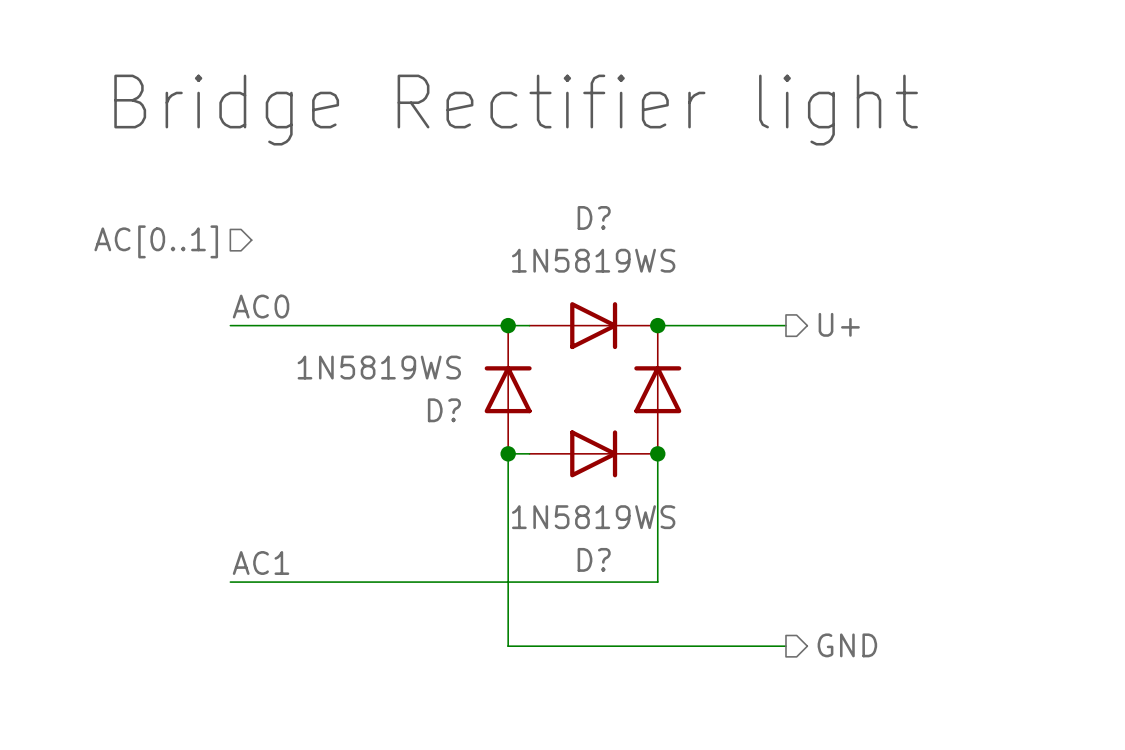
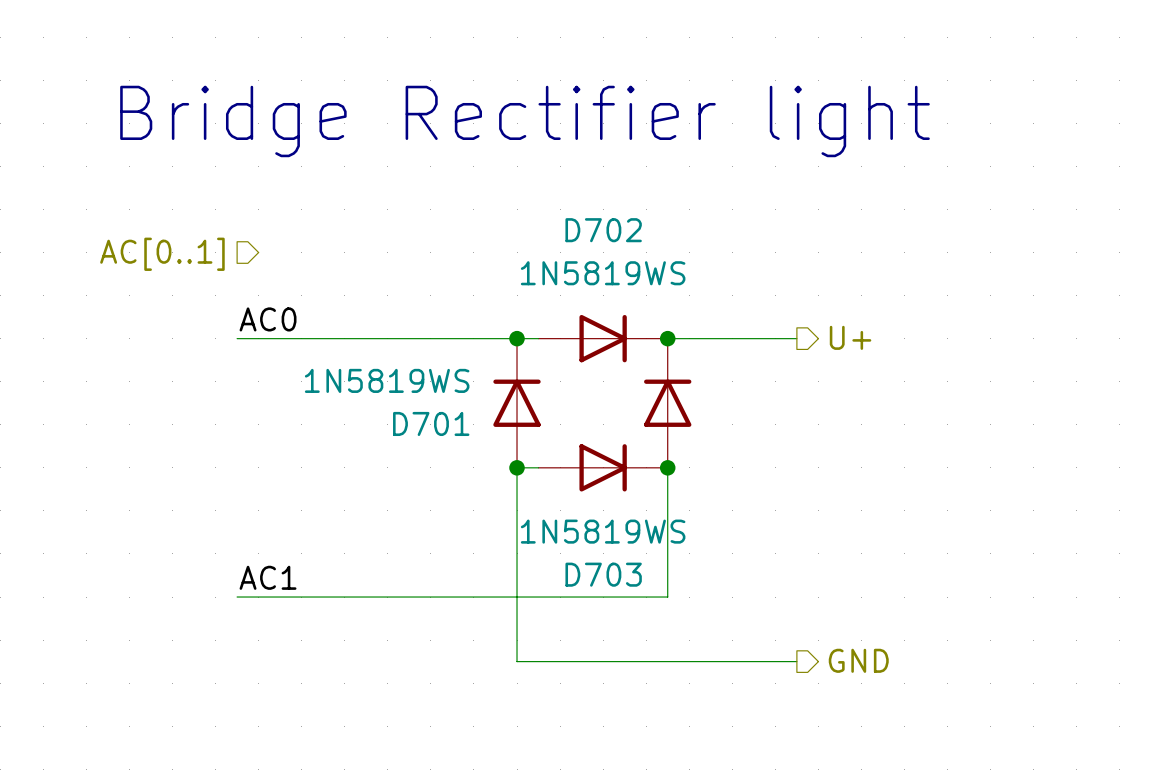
D? name: D? (594, 217) -> D702 (603, 230)
D? name: D? (444, 410) -> D701 (431, 423)
D? name: D? (594, 559) -> D703 (603, 574)

